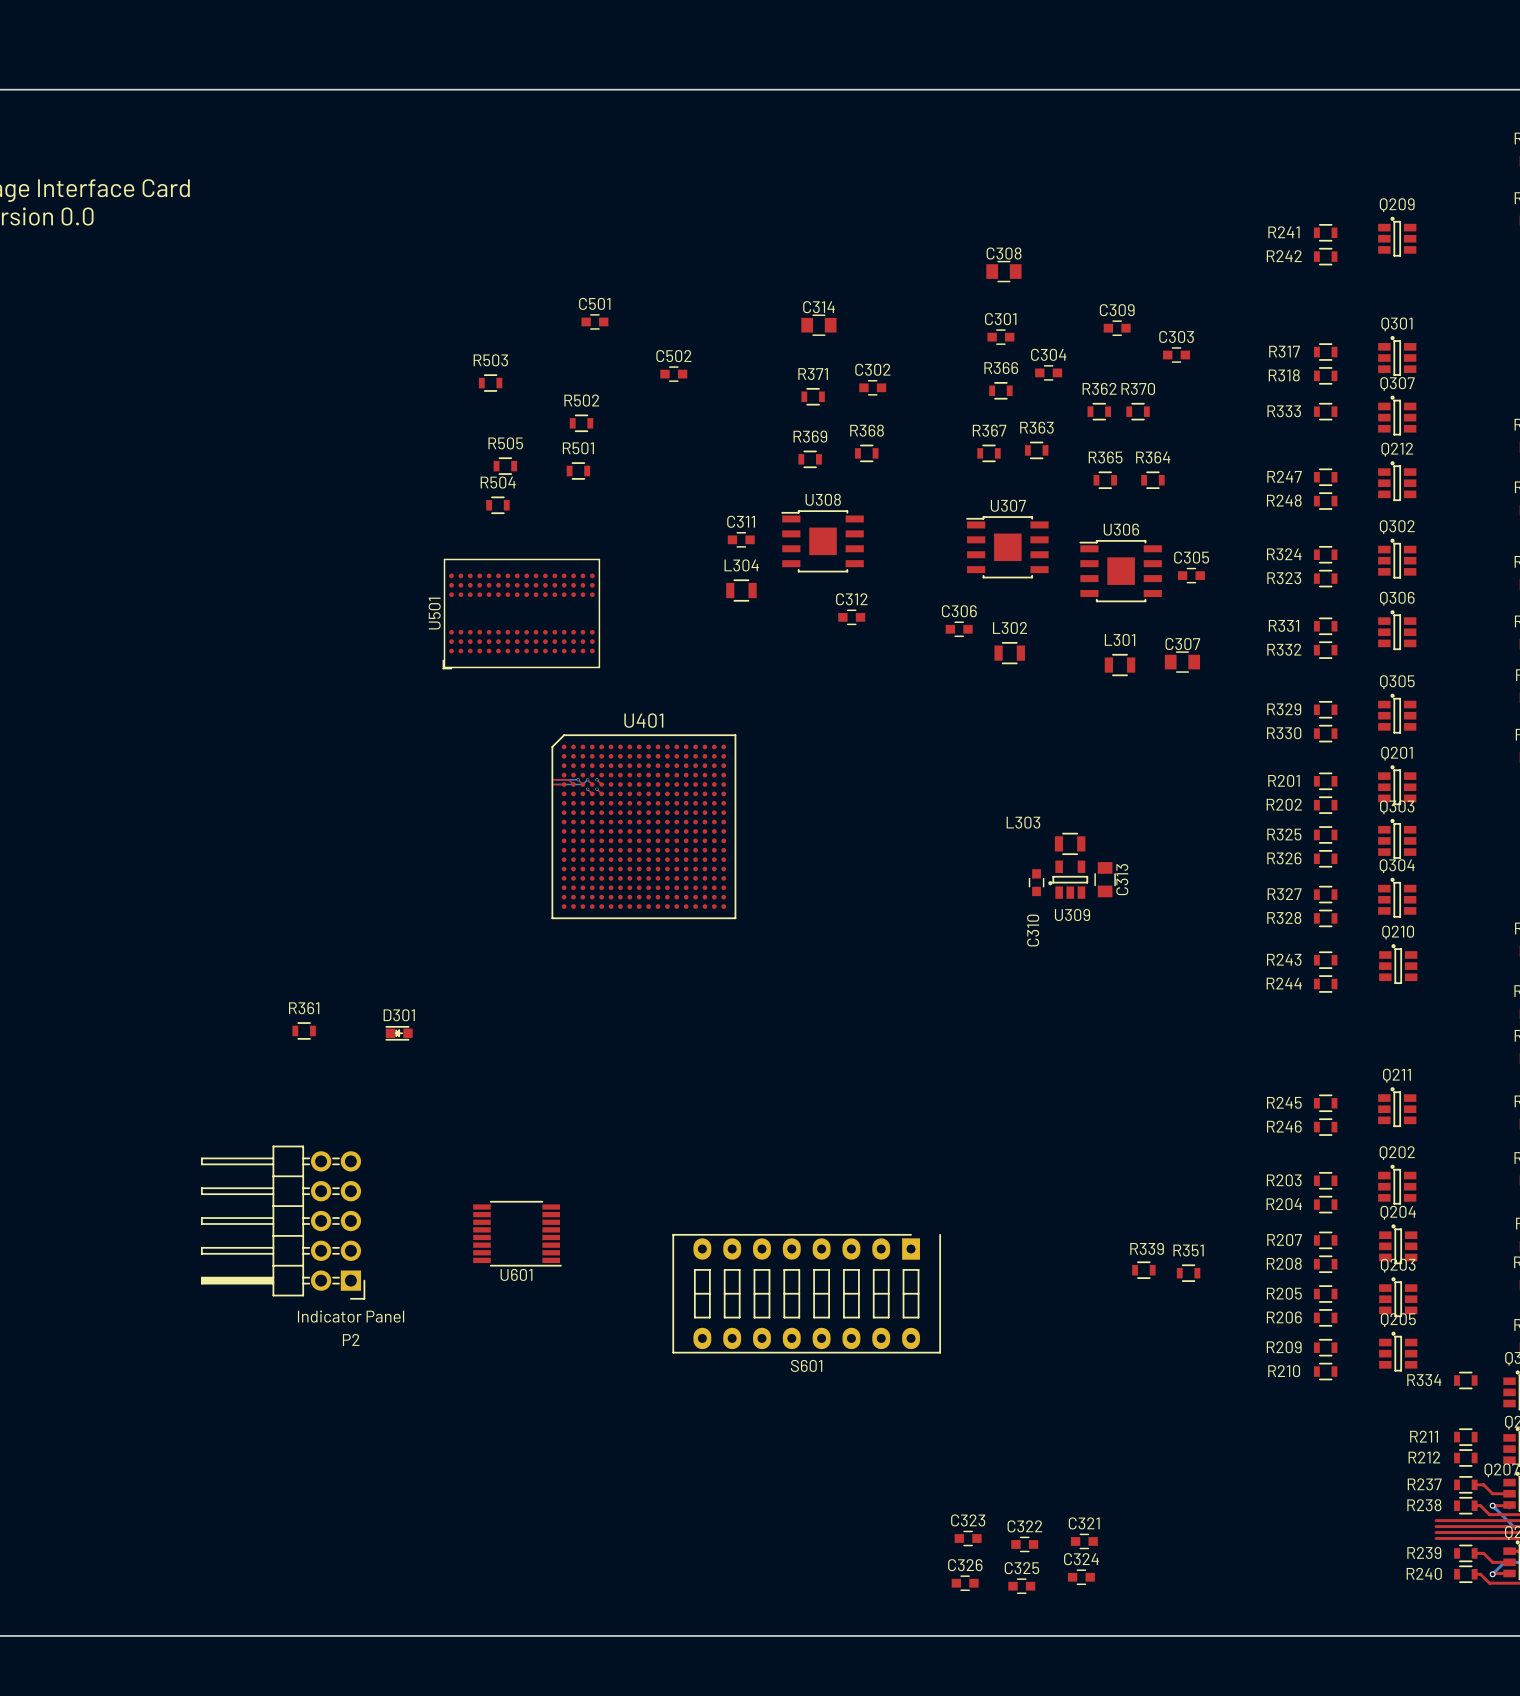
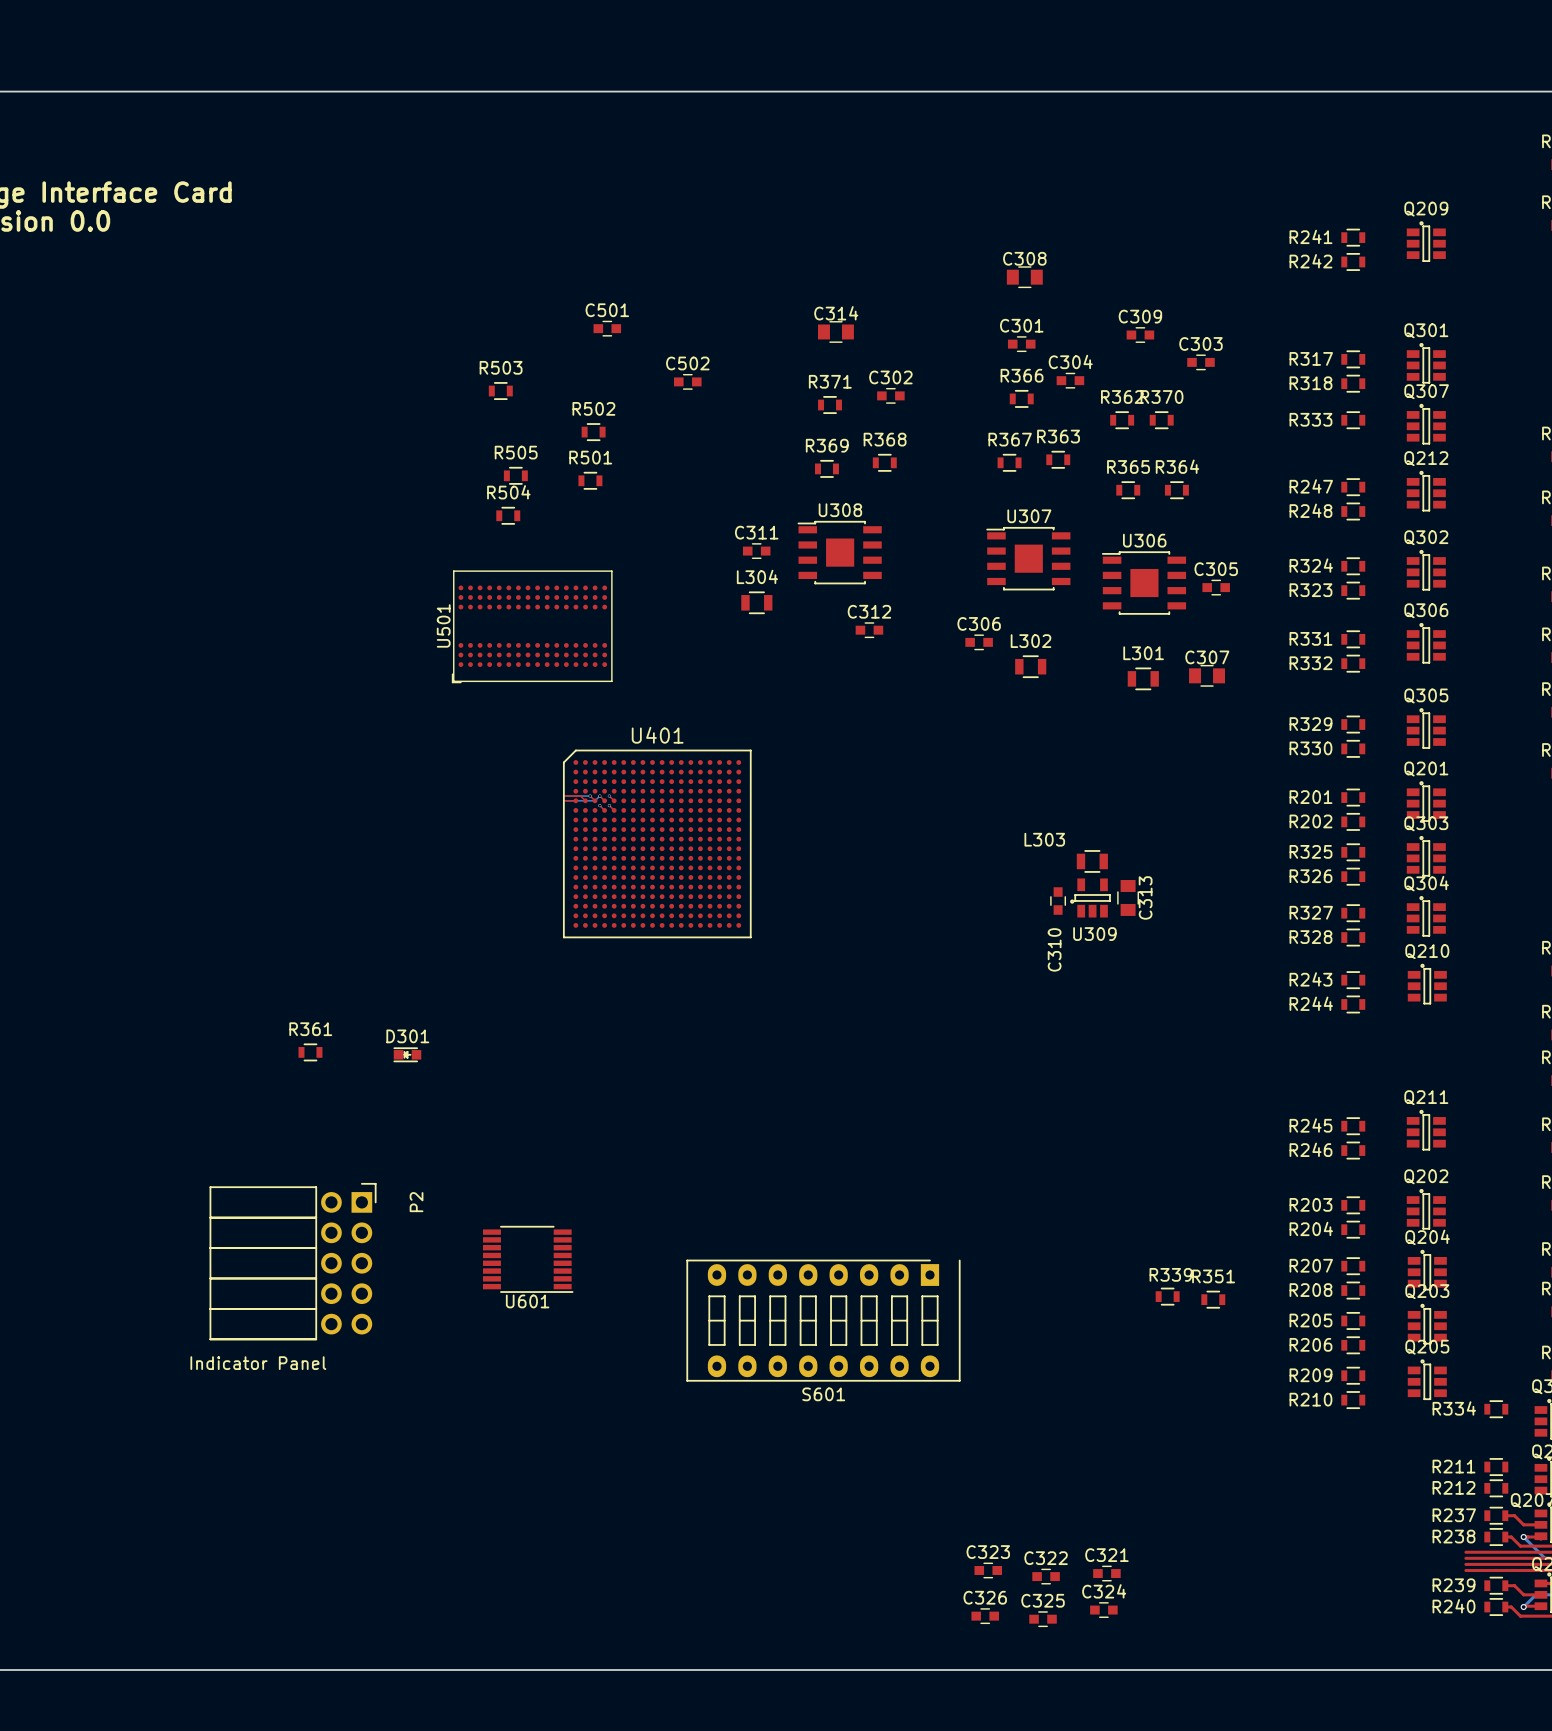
P2 footprint: [200, 1145, 366, 1300] -> [209, 1182, 377, 1341]
P2 value position: Indicator Panel (351, 1316) -> Indicator Panel (258, 1363)
P2 name position: P2 (351, 1339) -> P2 (416, 1202)

